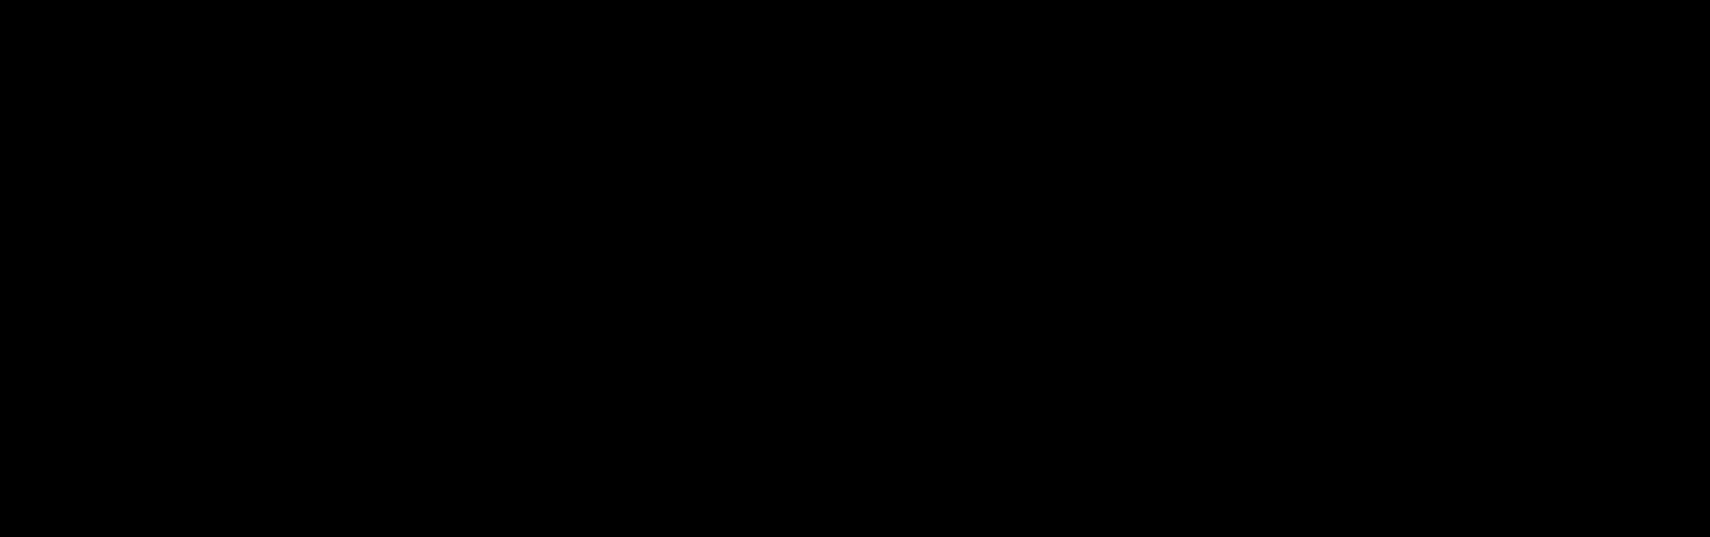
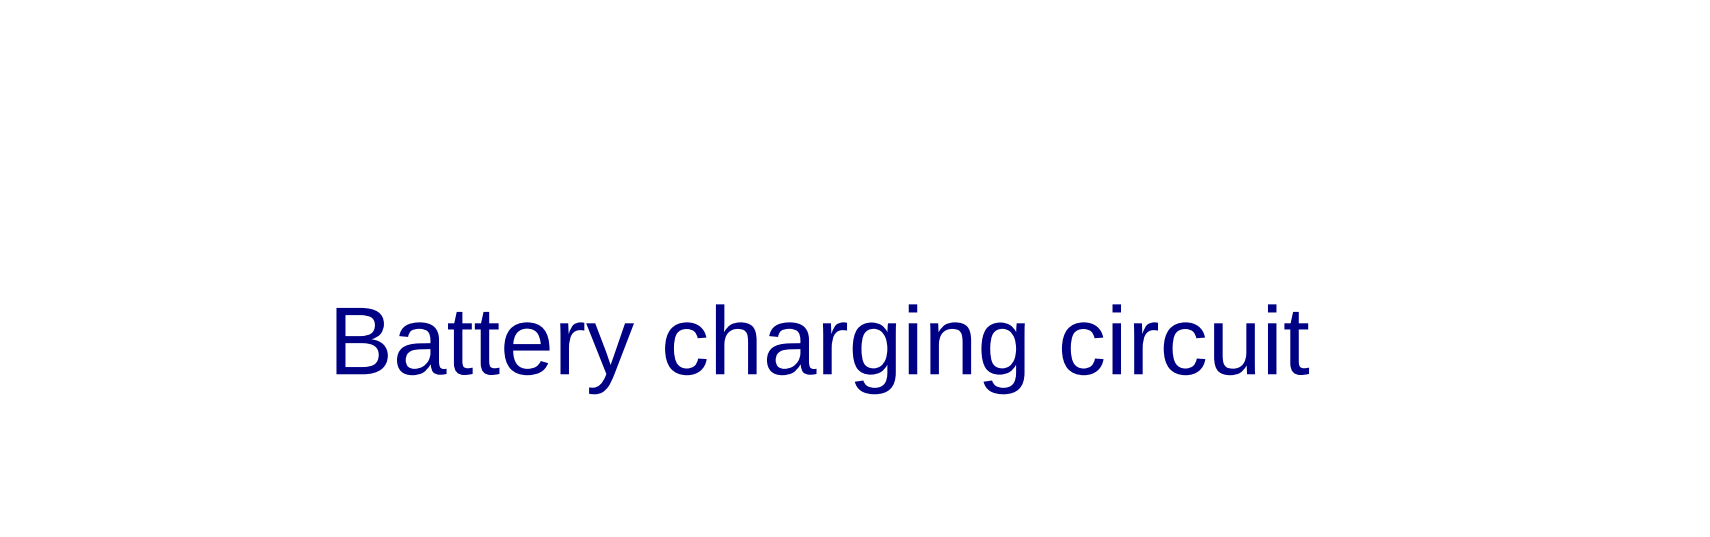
text: none -> Battery charging circuit (822, 349)

